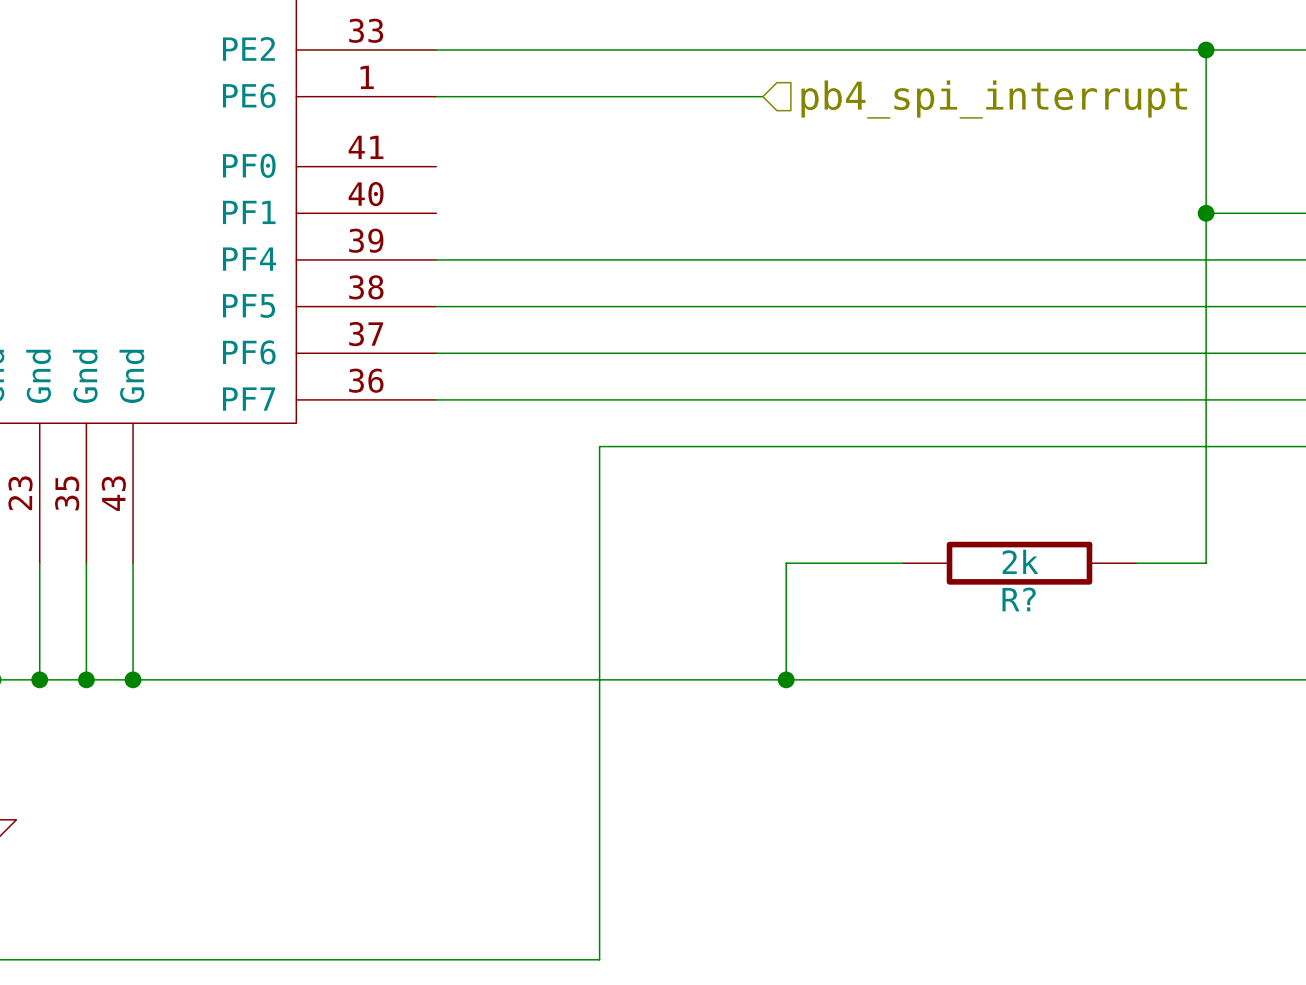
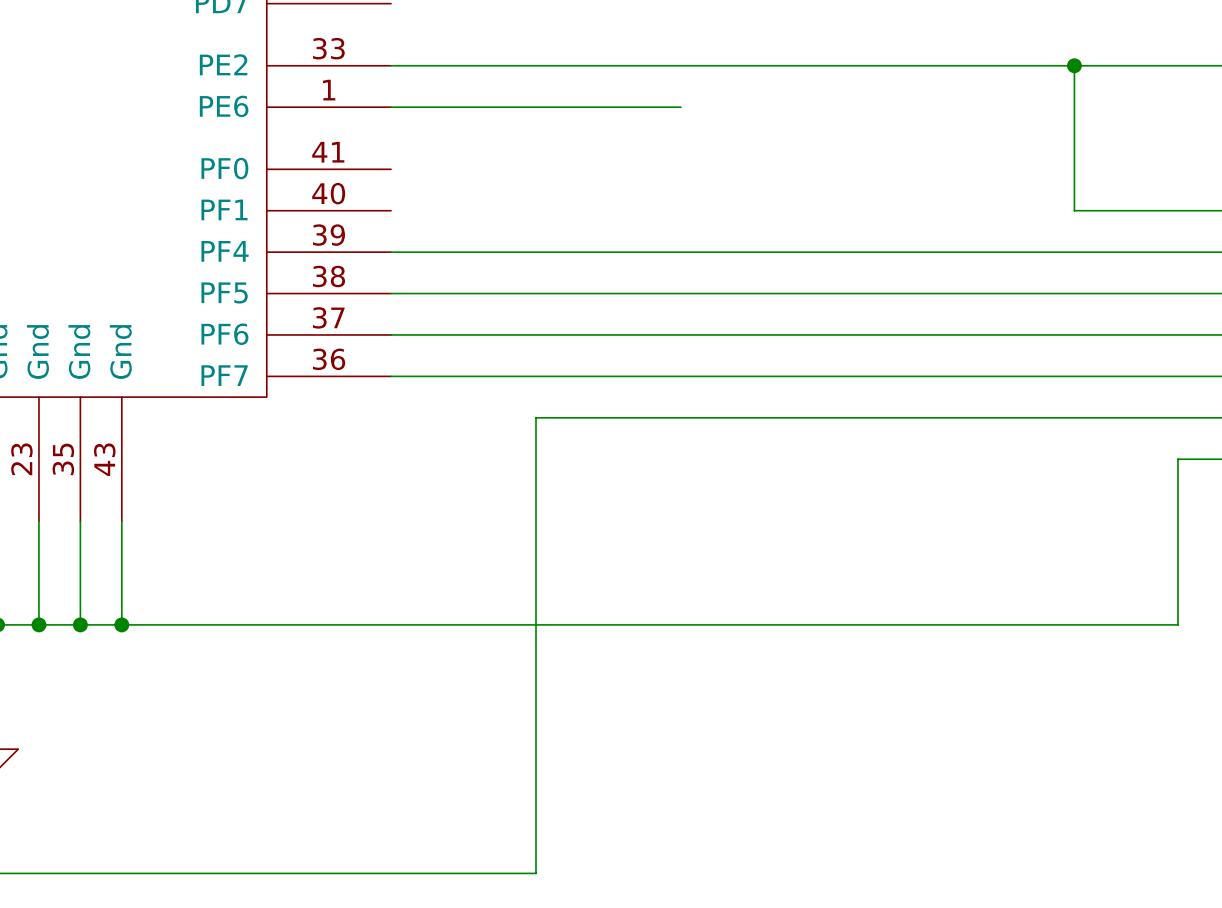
hierarchical label: pb4_spi_interrupt (994, 99) -> none
wire: (1206, 213) (1206, 563) (1136, 563) -> none
junction: (1206, 213) -> none
wire: (902, 563) (786, 563) (786, 679) -> none
R?: 2k (1019, 563) -> none
junction: (786, 679) -> none

